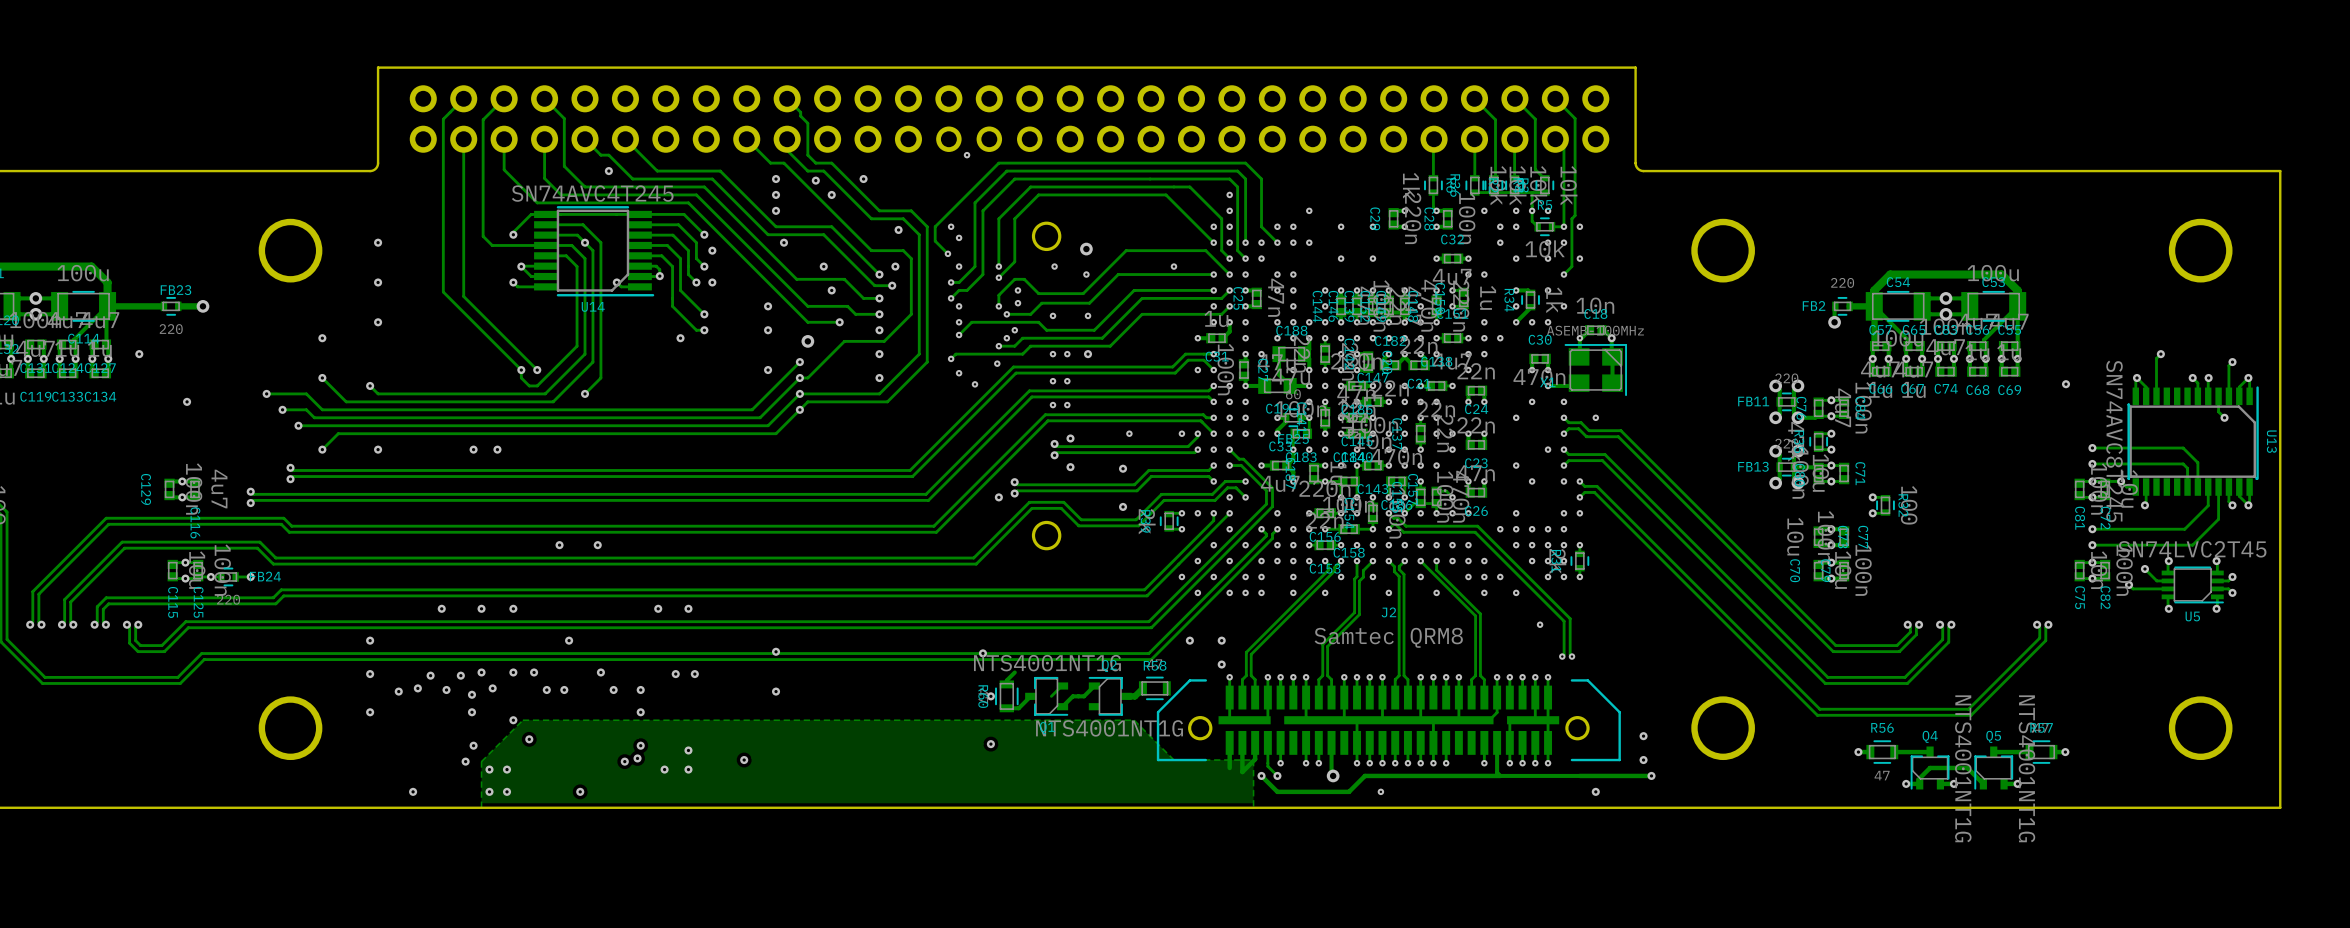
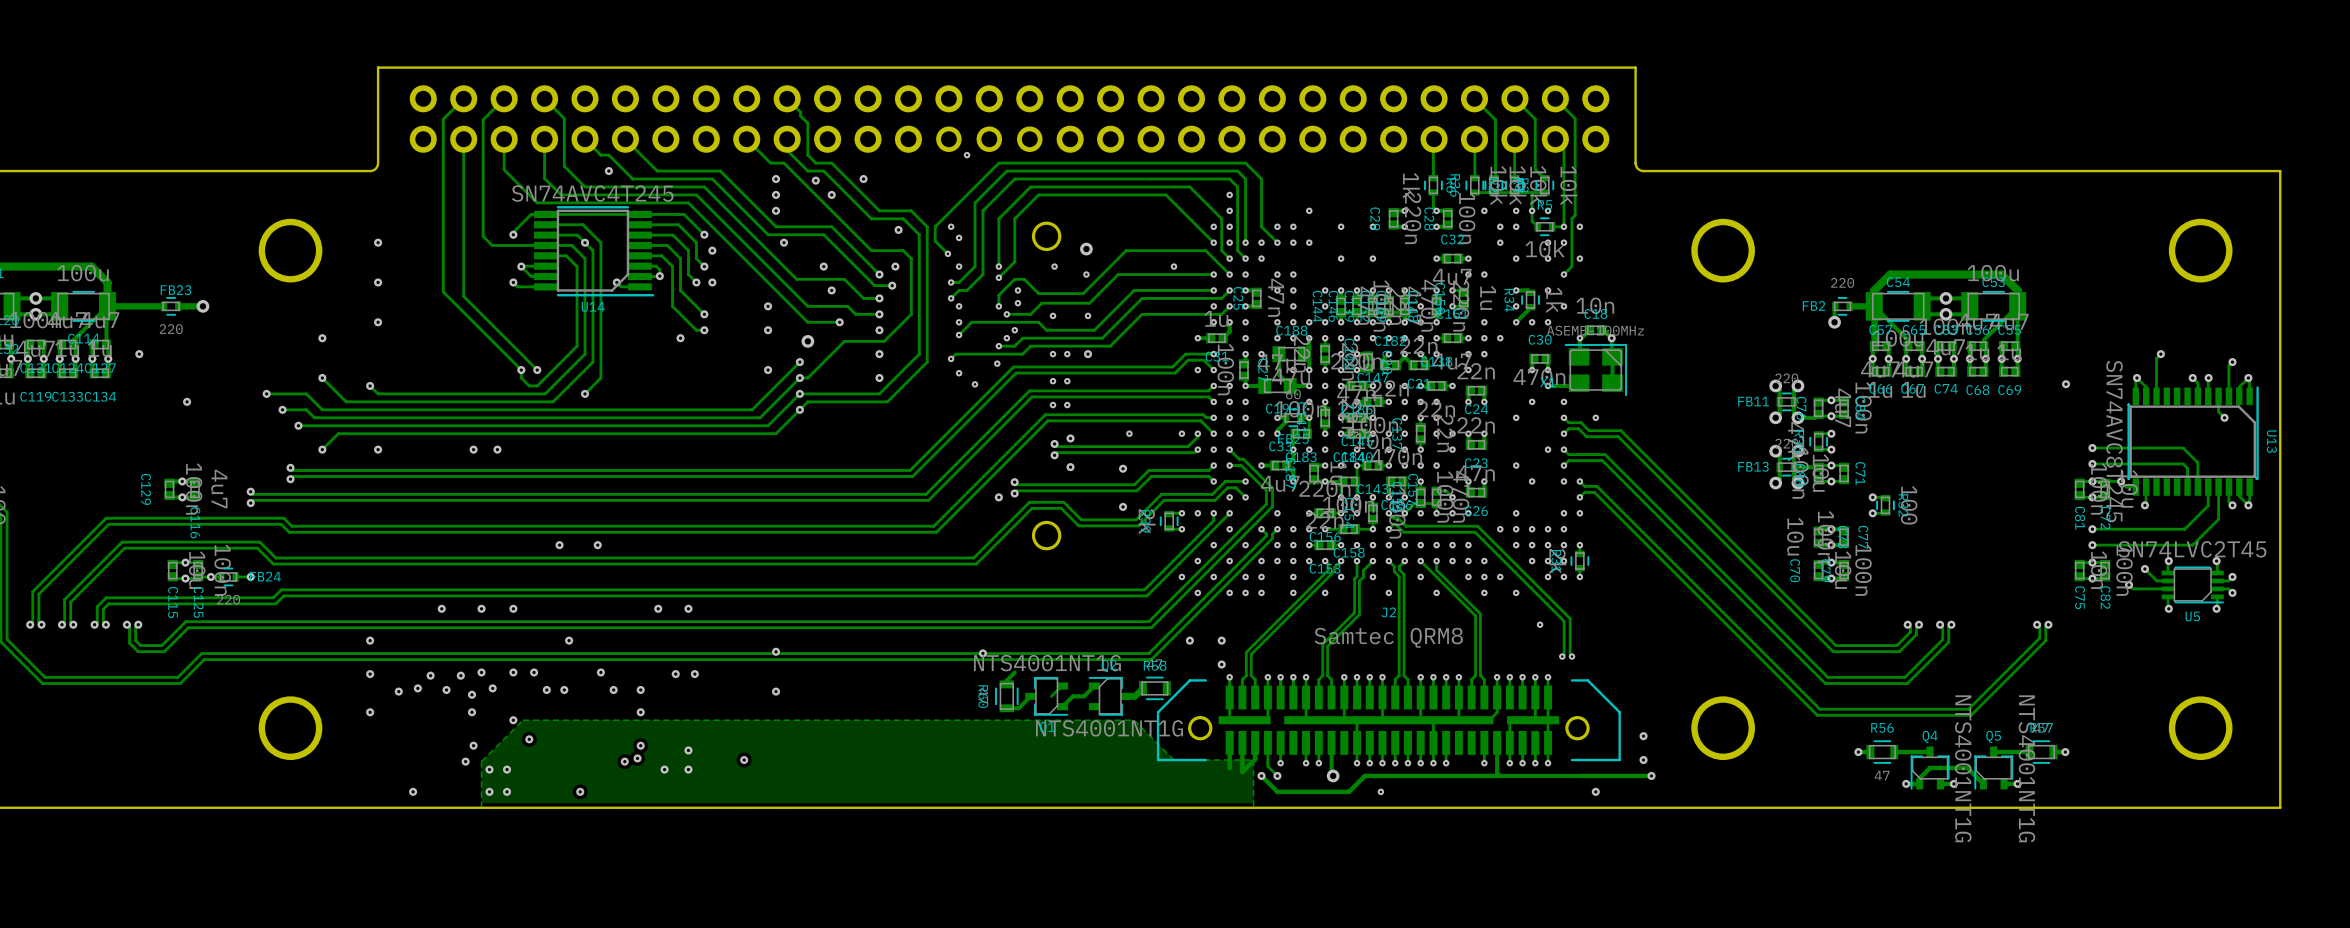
via: (990, 696) -> none
via: (990, 744) -> none

